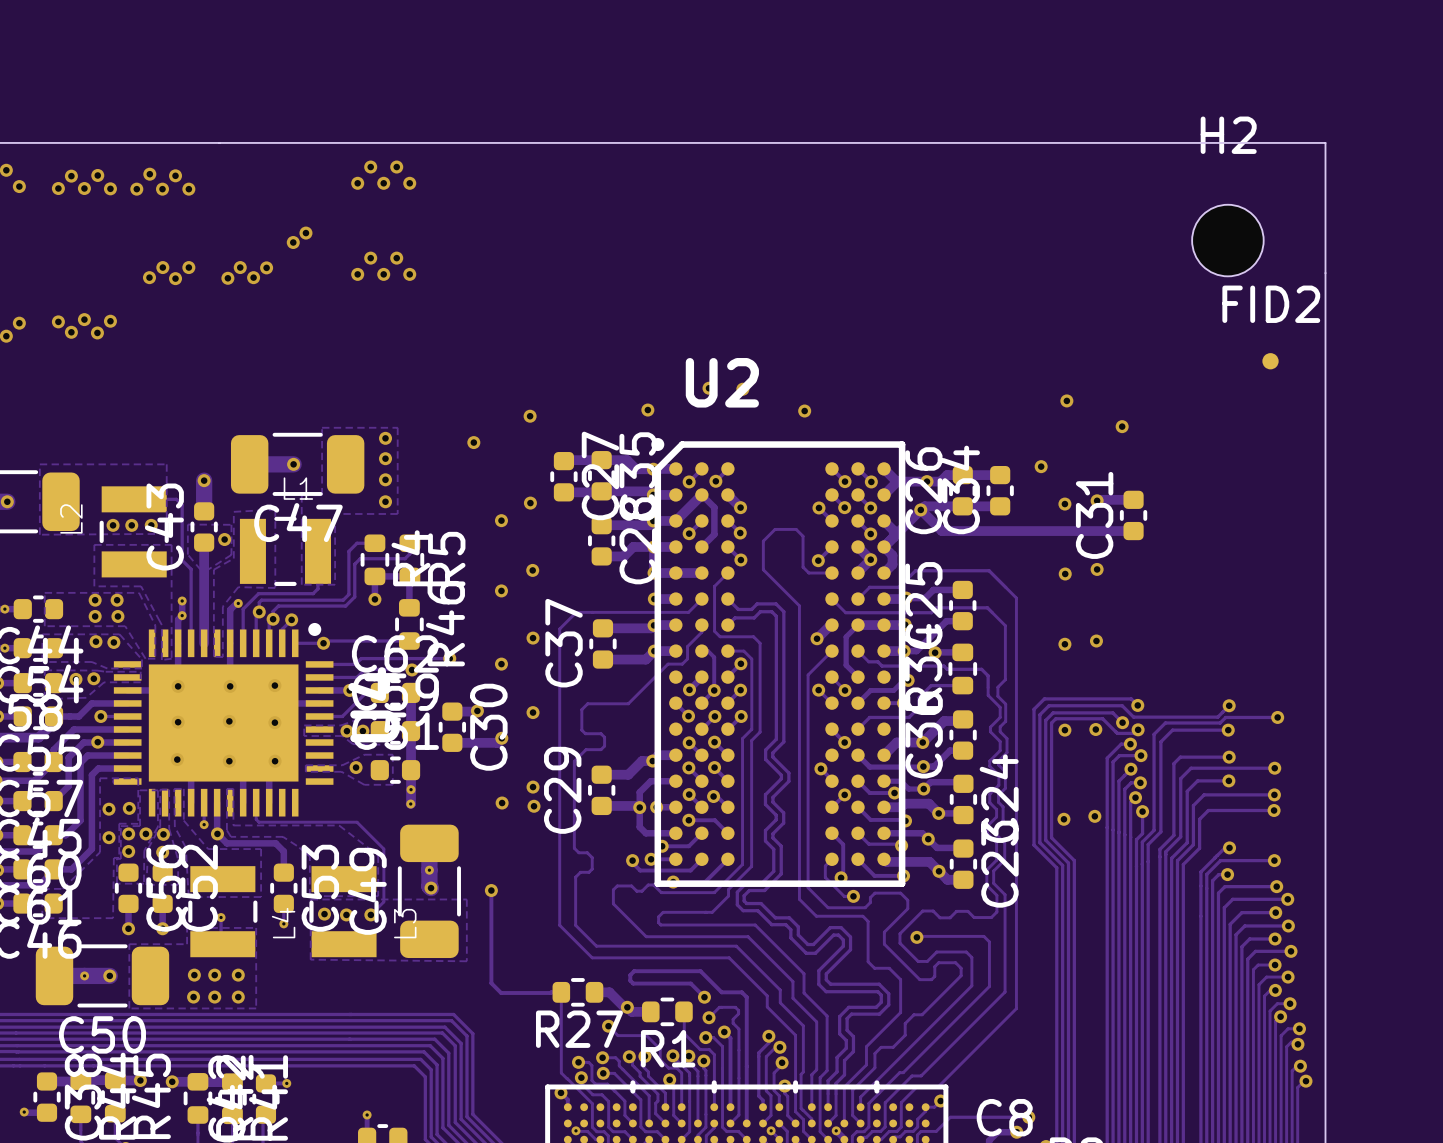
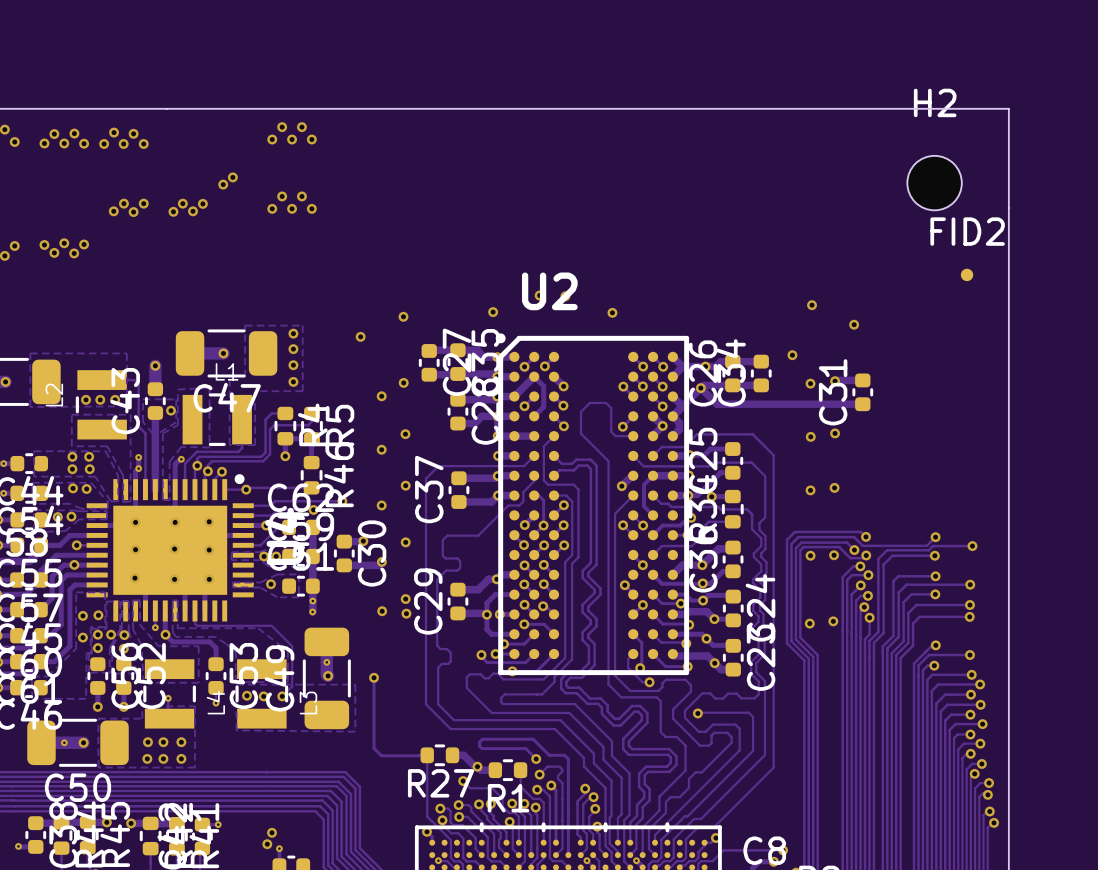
via: none -> (272, 832)
via: none -> (267, 844)

